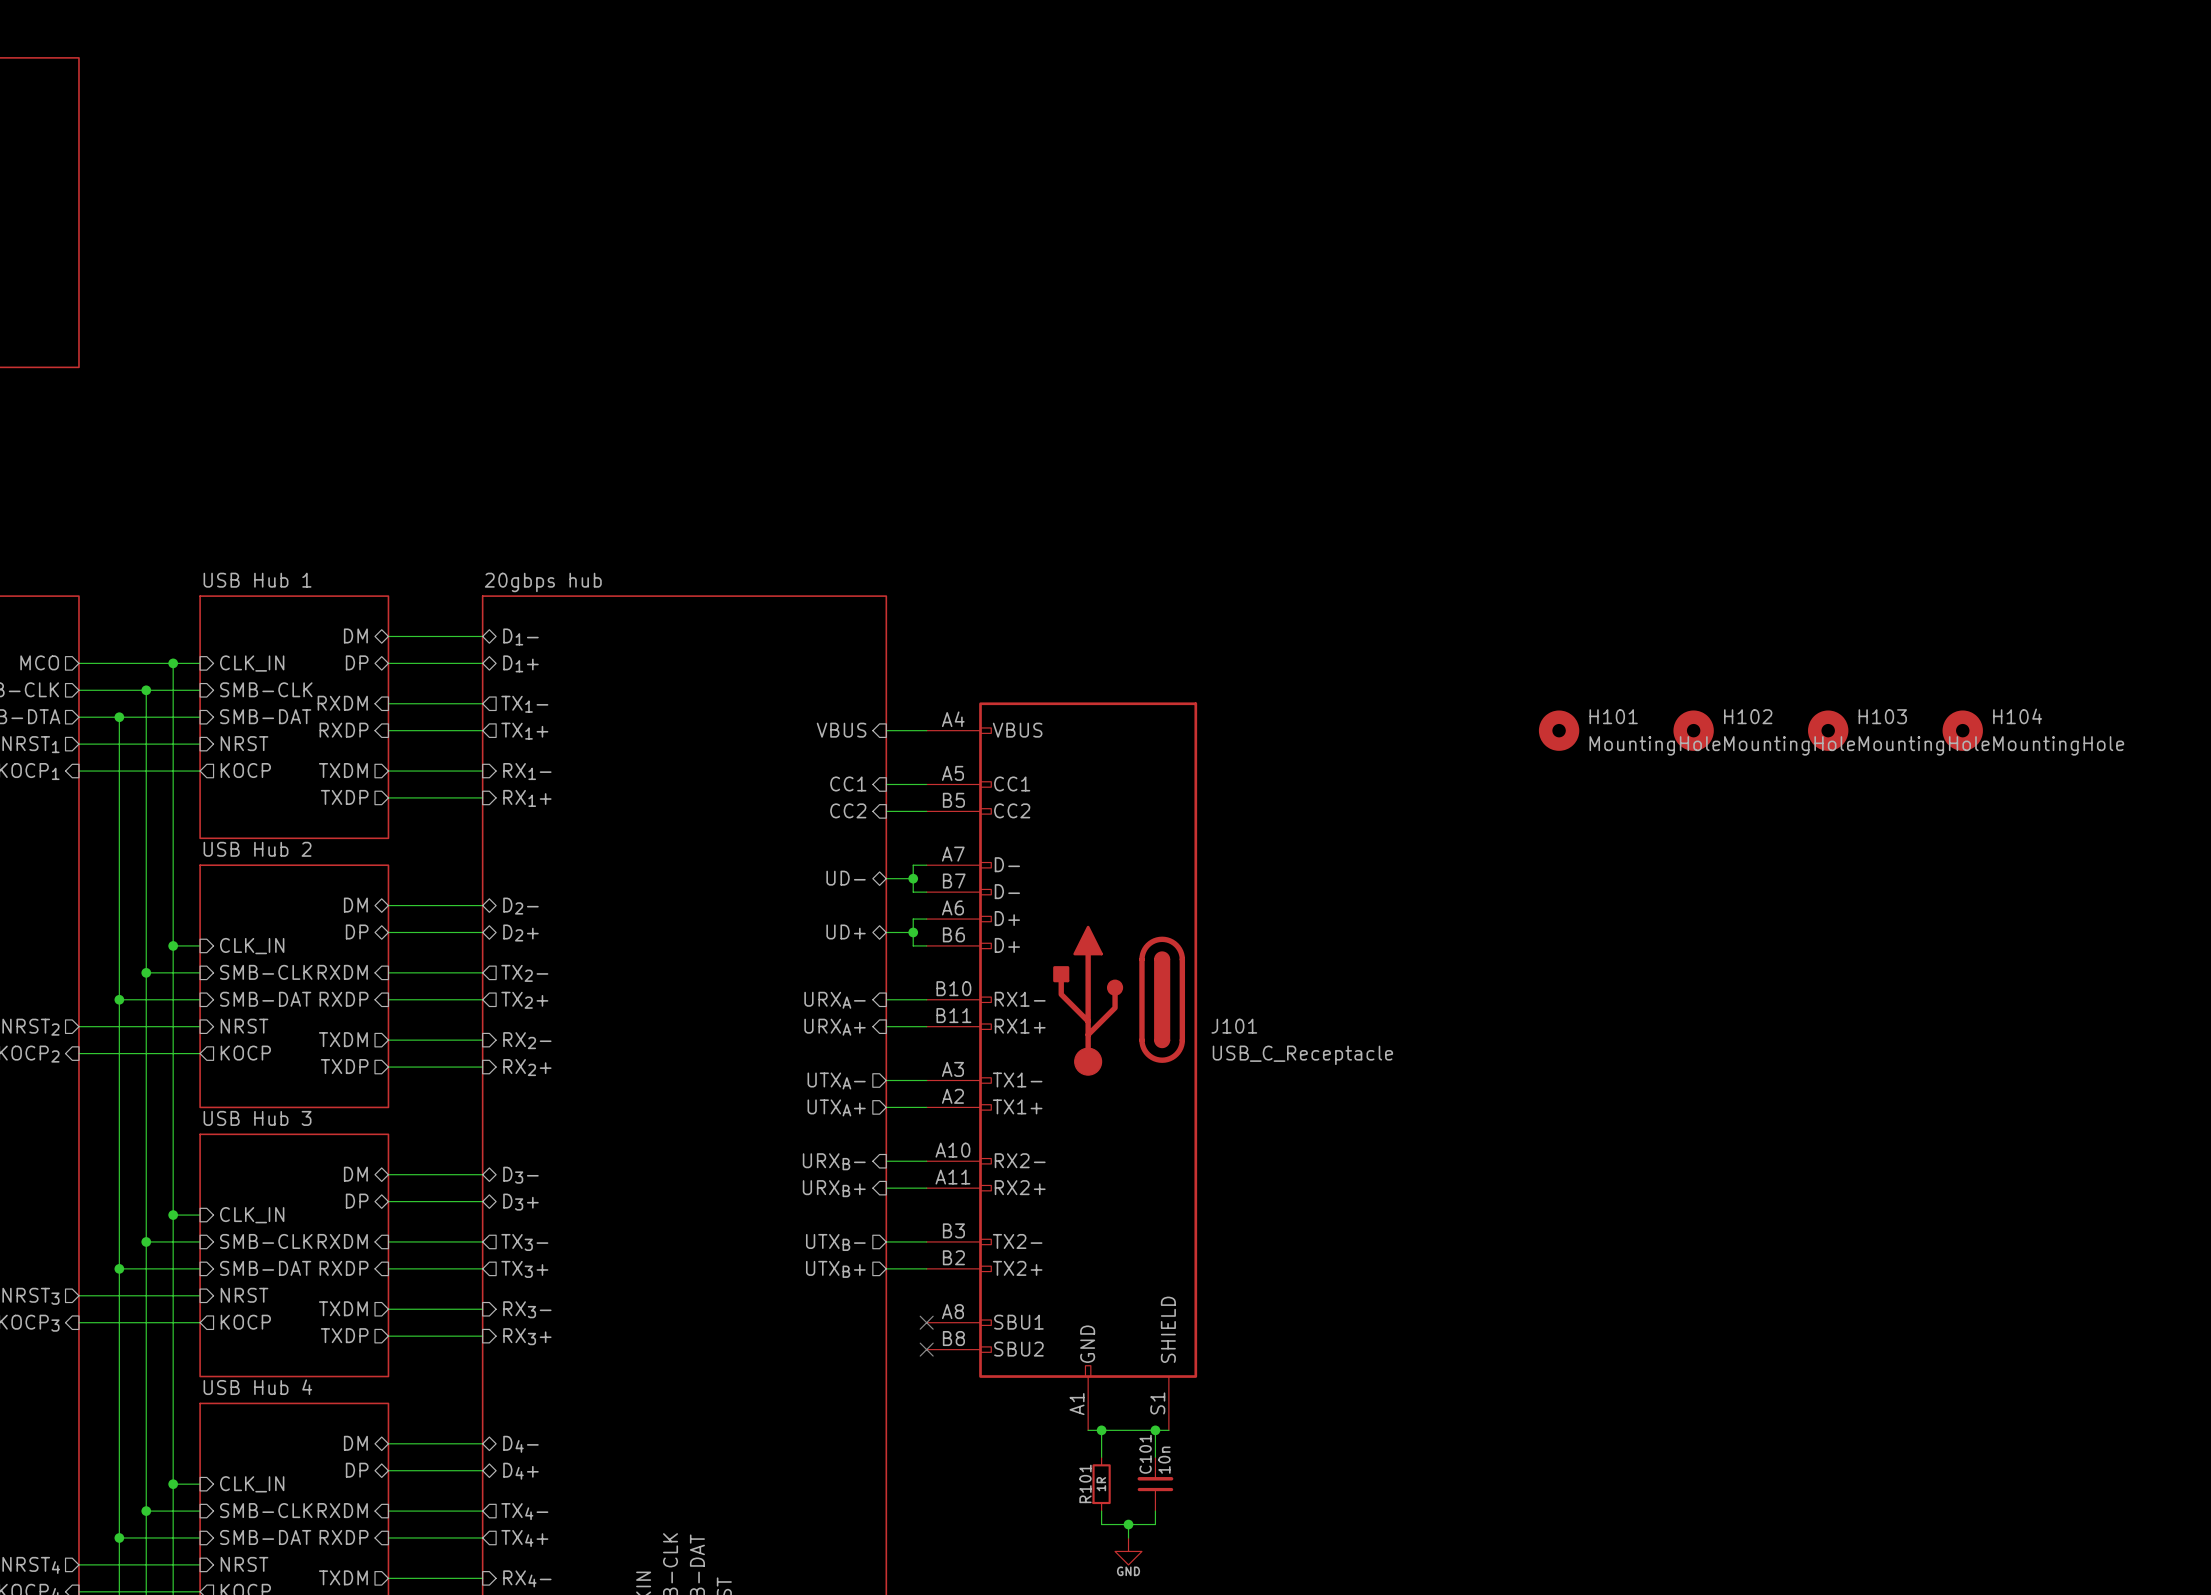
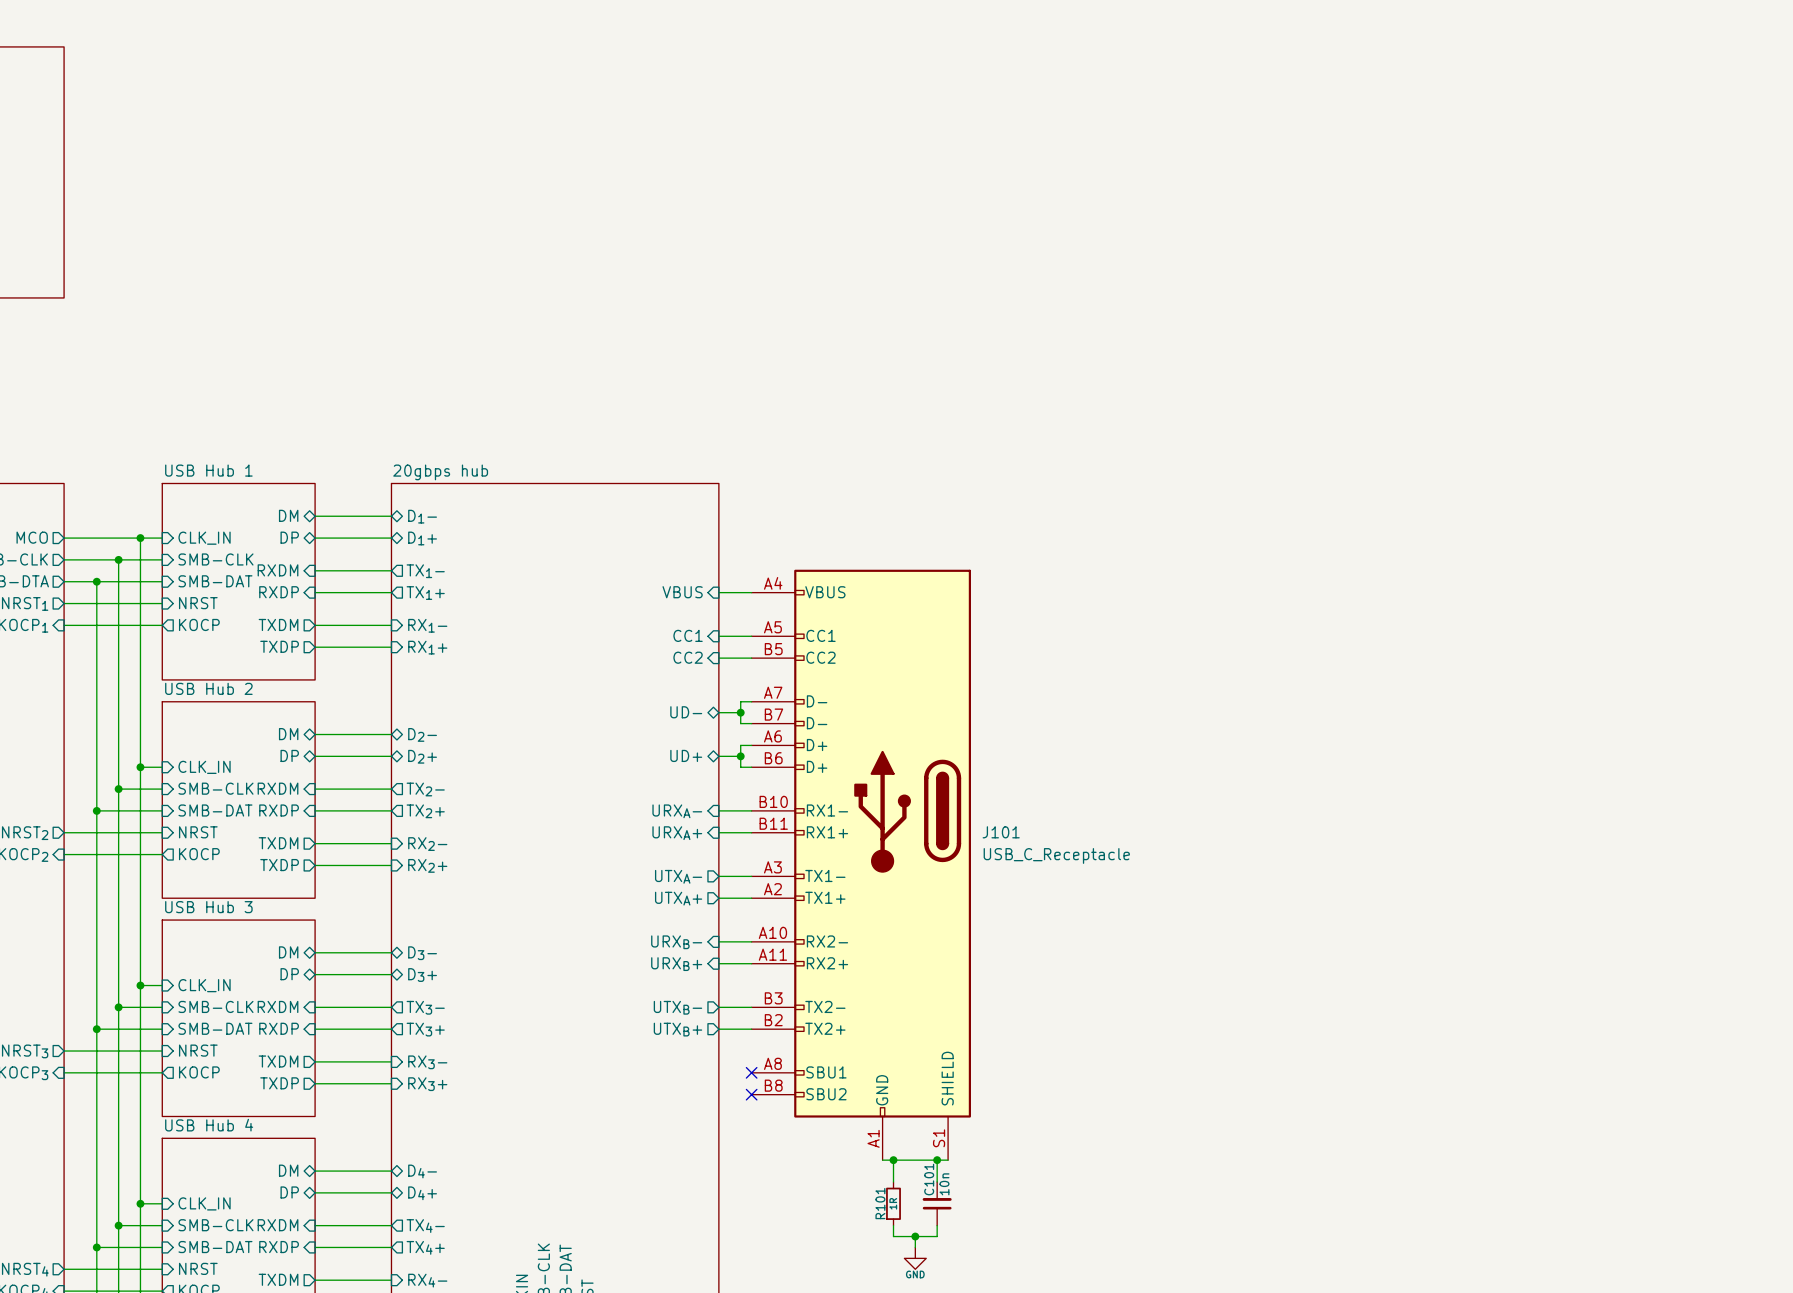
H101: MountingHole (1559, 730) -> none
H102: MountingHole (1693, 730) -> none
H103: MountingHole (1828, 730) -> none
H104: MountingHole (1962, 730) -> none

